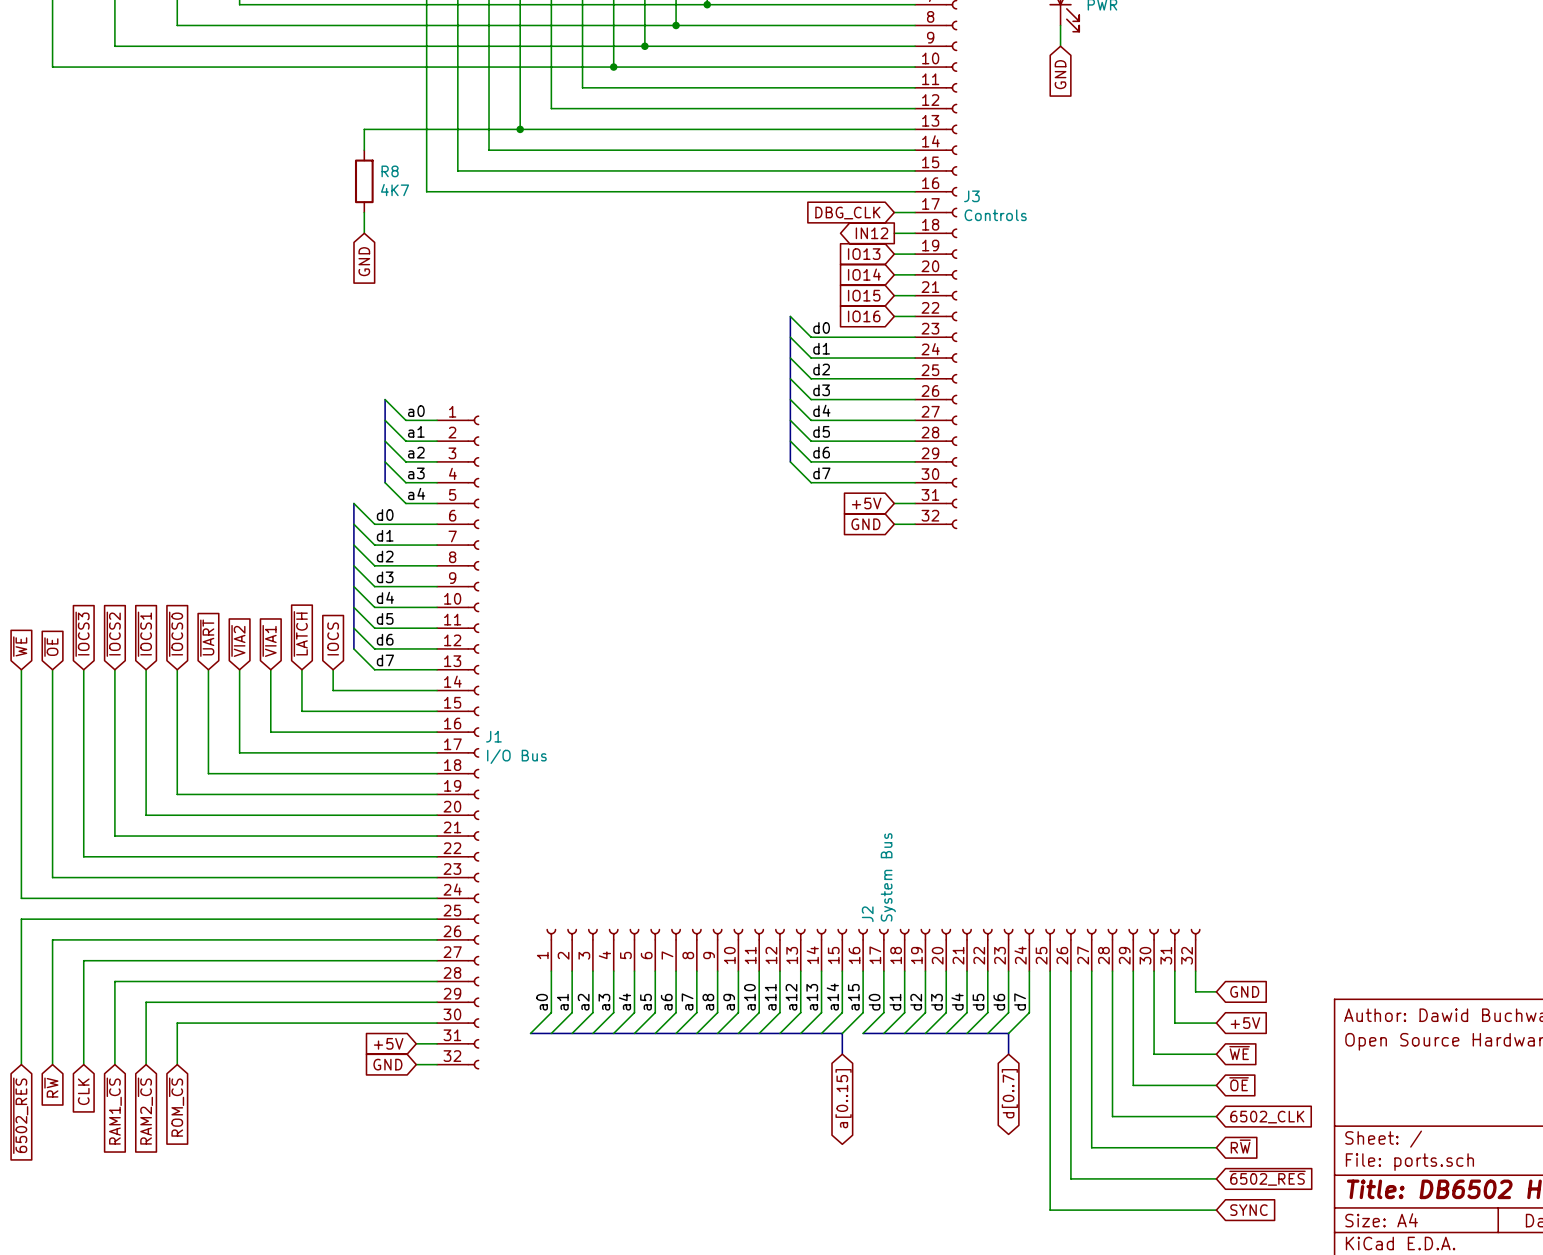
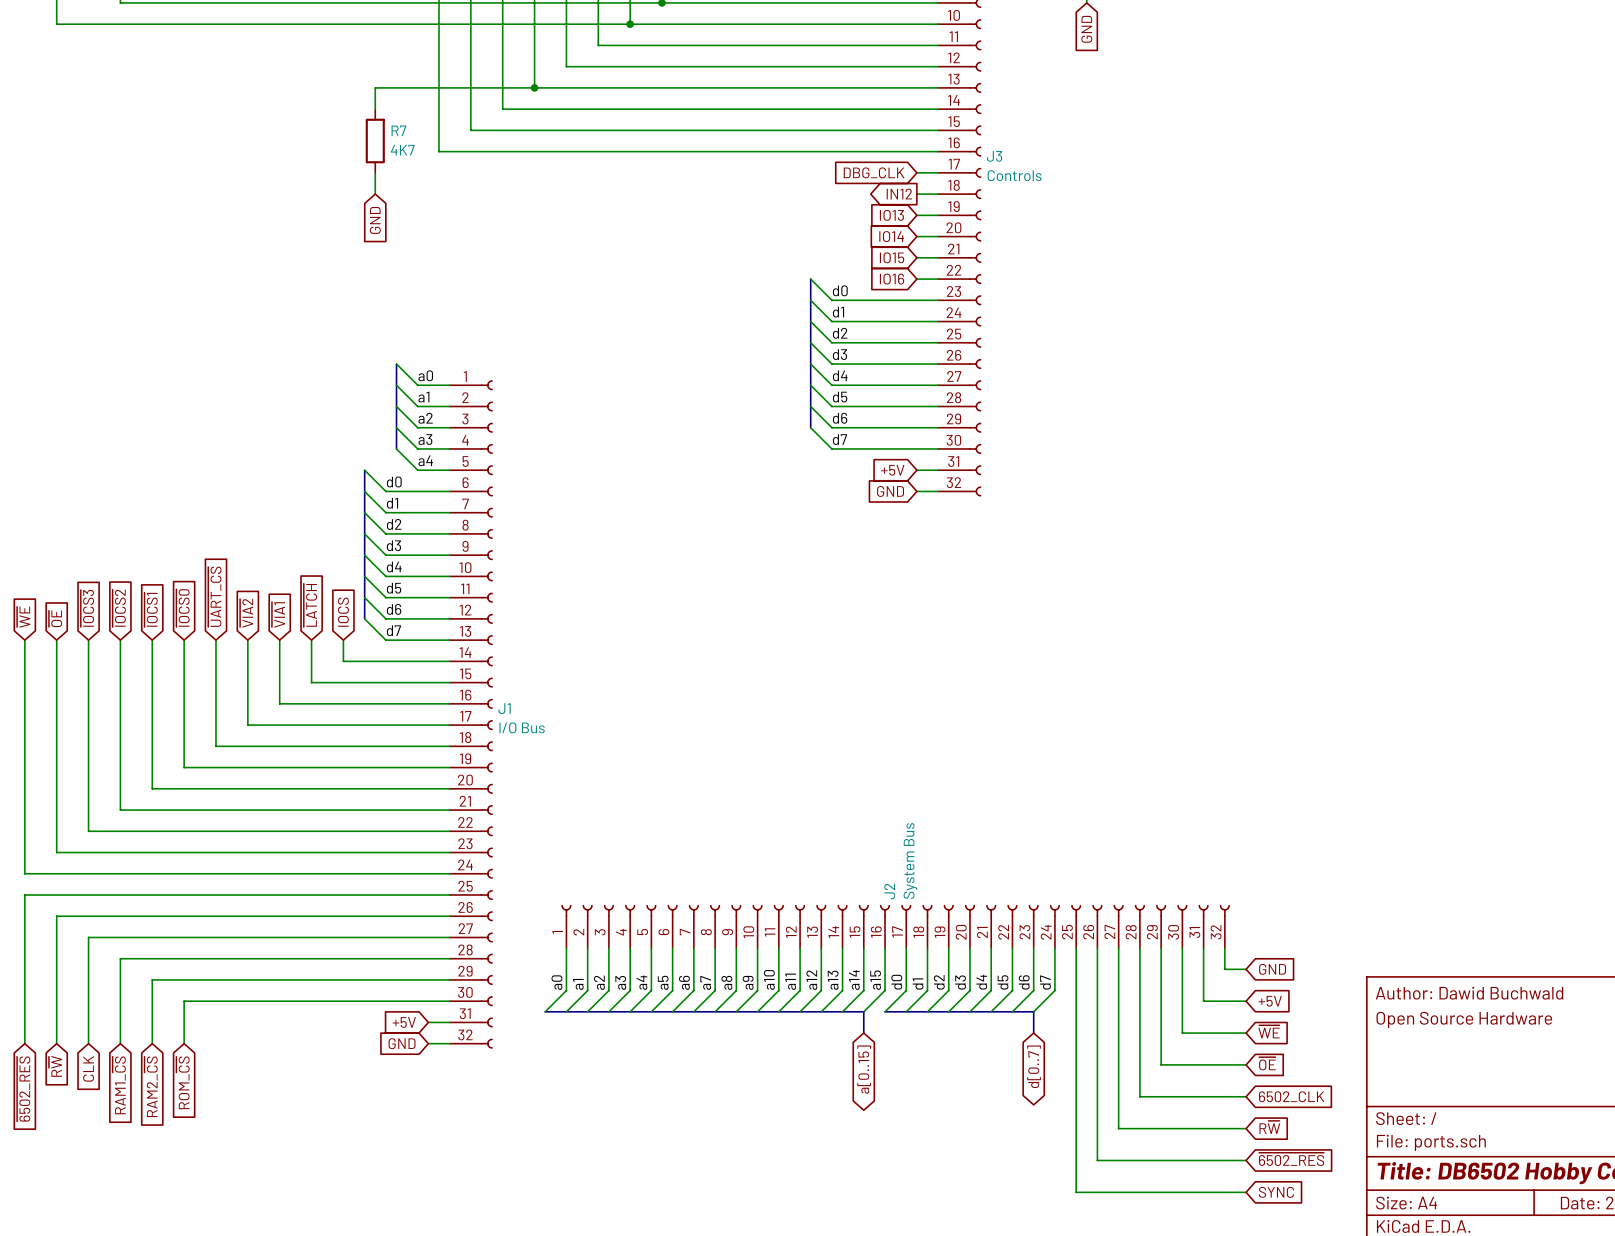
R8 name: R8 (390, 171) -> R7 (398, 130)
global label: ~{UART} (207, 638) -> ~{UART_CS} (214, 596)

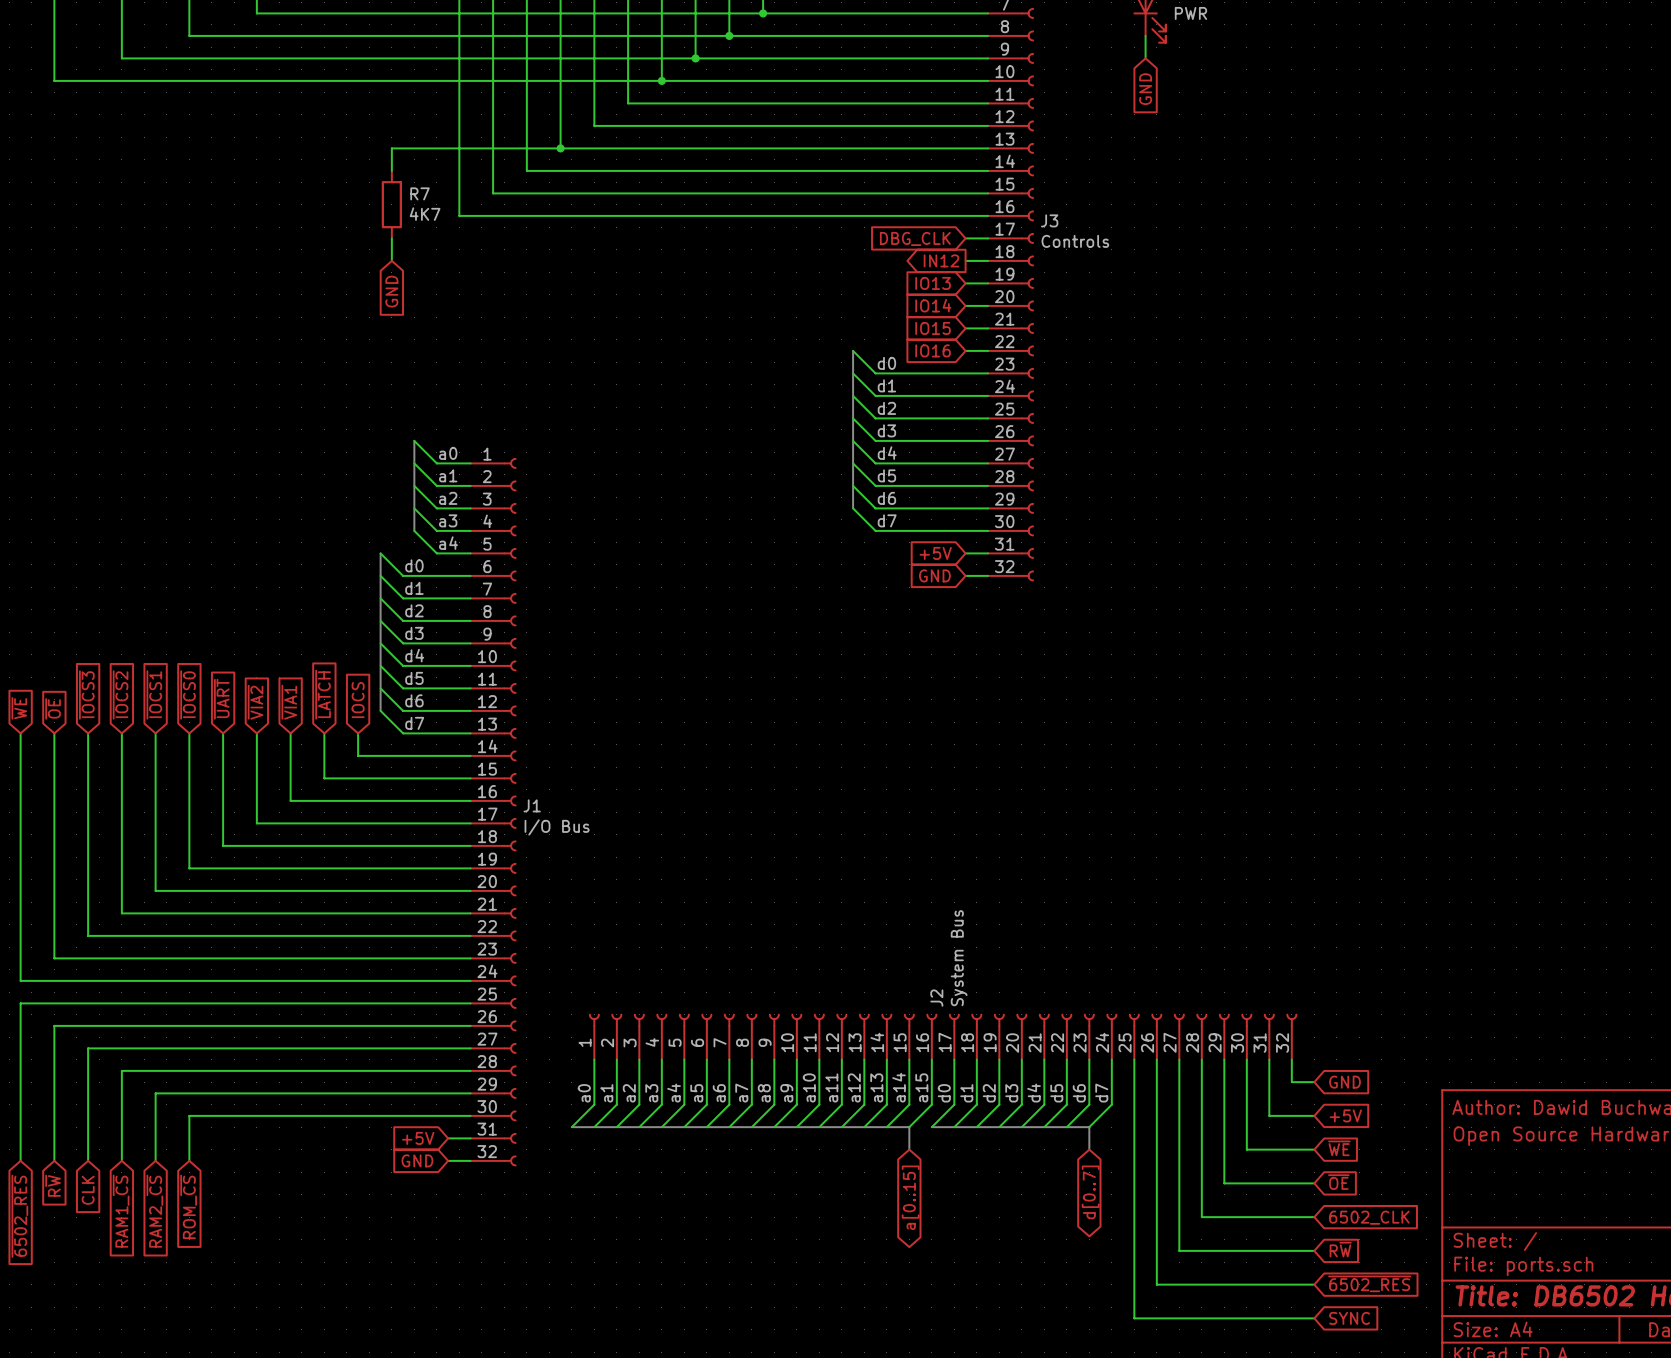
global label: ~{UART_CS} (214, 596) -> ~{UART} (221, 699)

